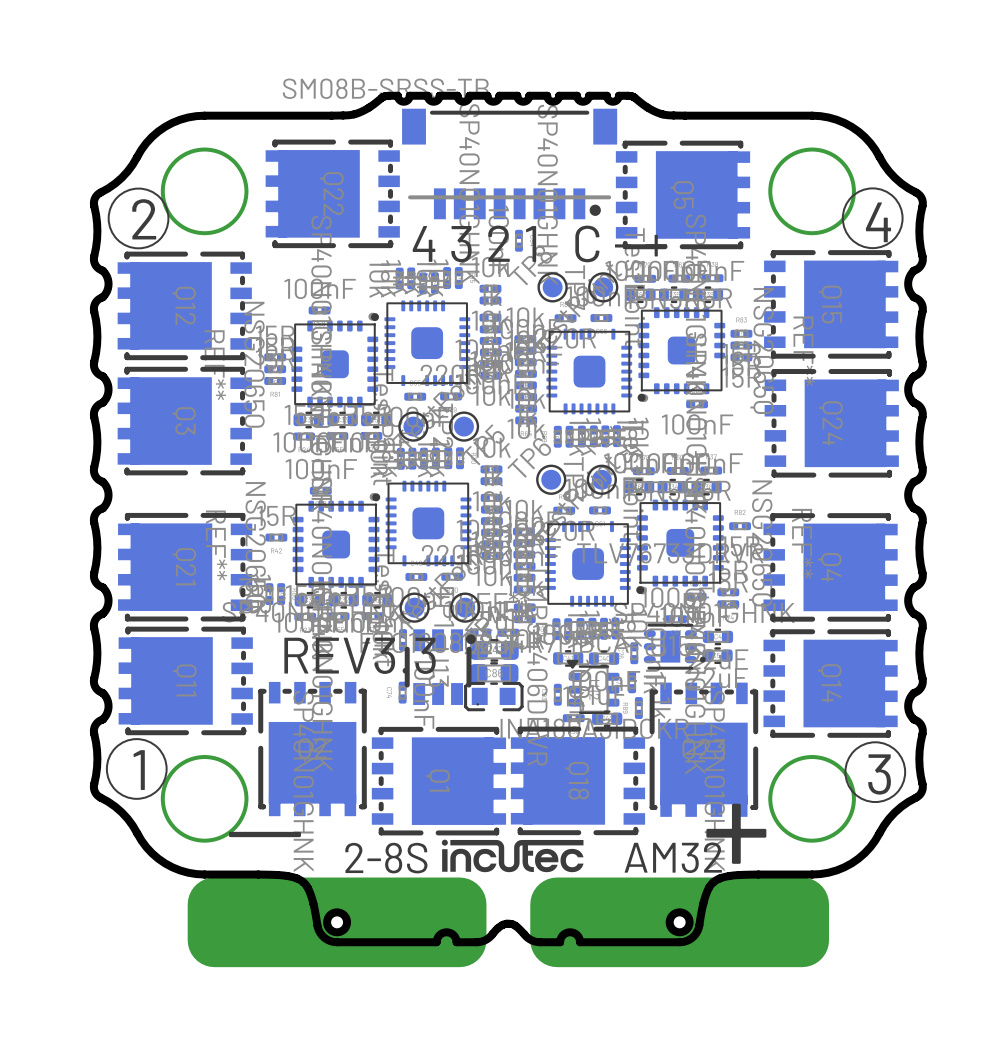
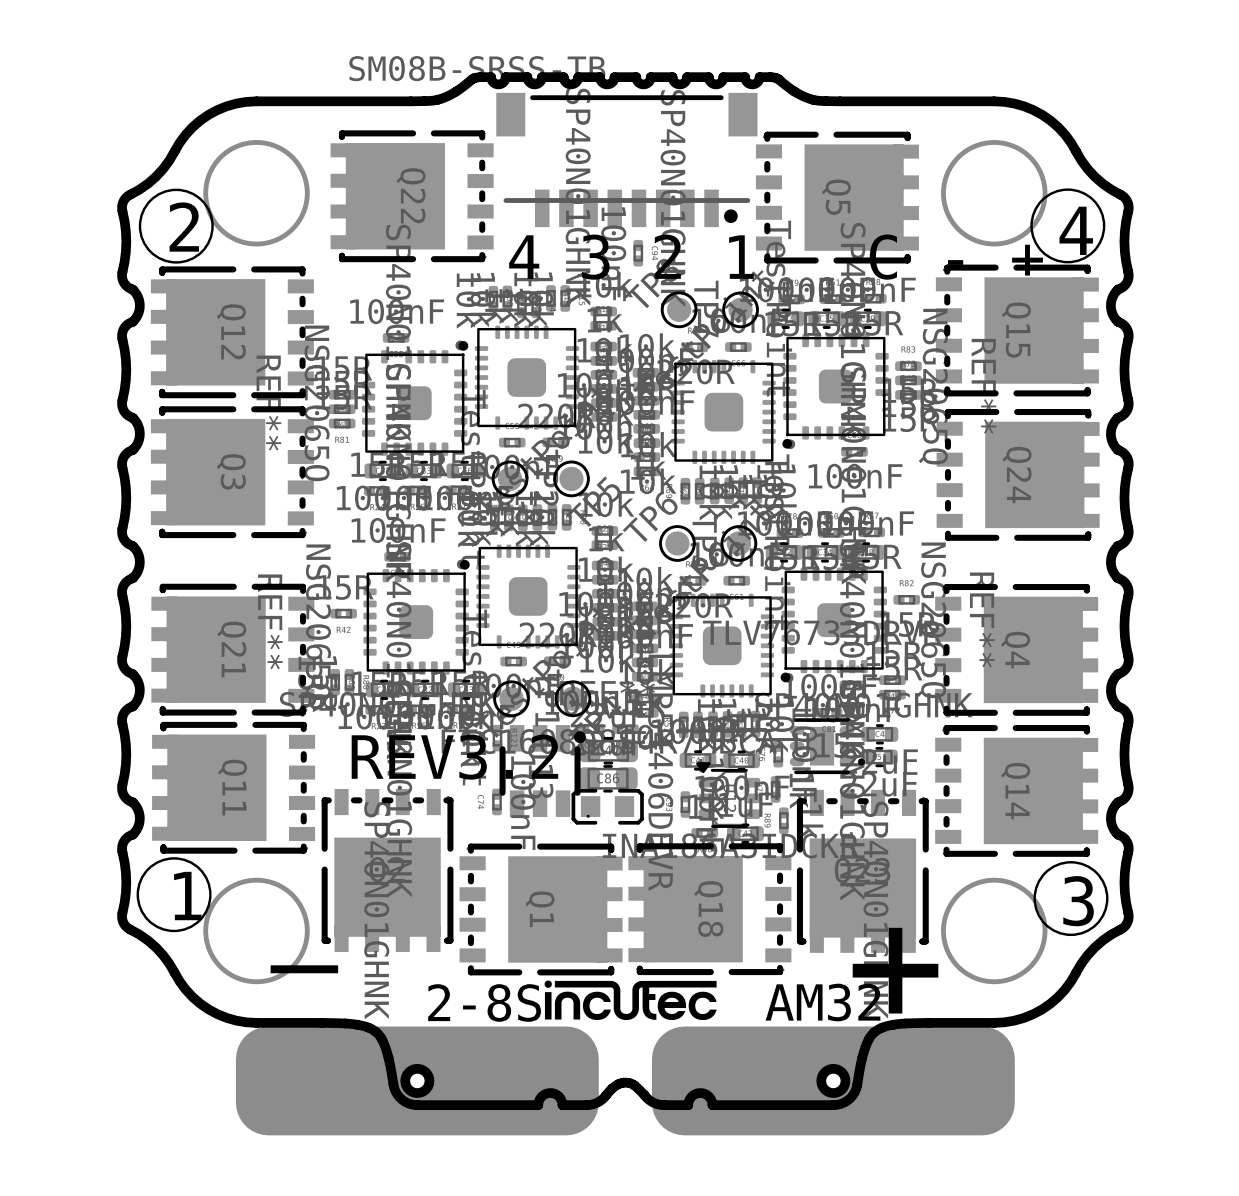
text: REV3.3 (360, 655) -> REV3.2 (454, 757)

